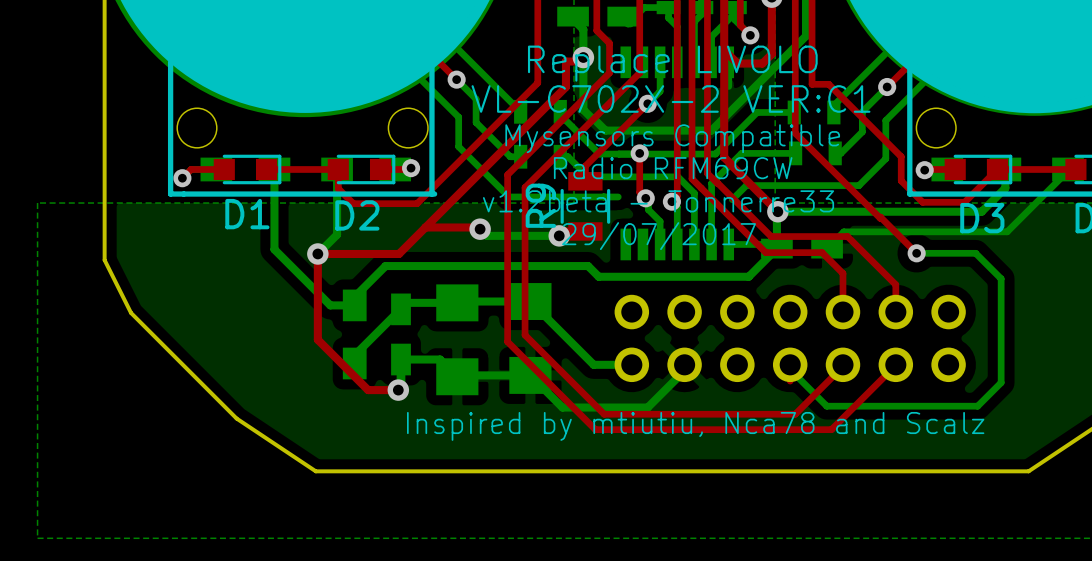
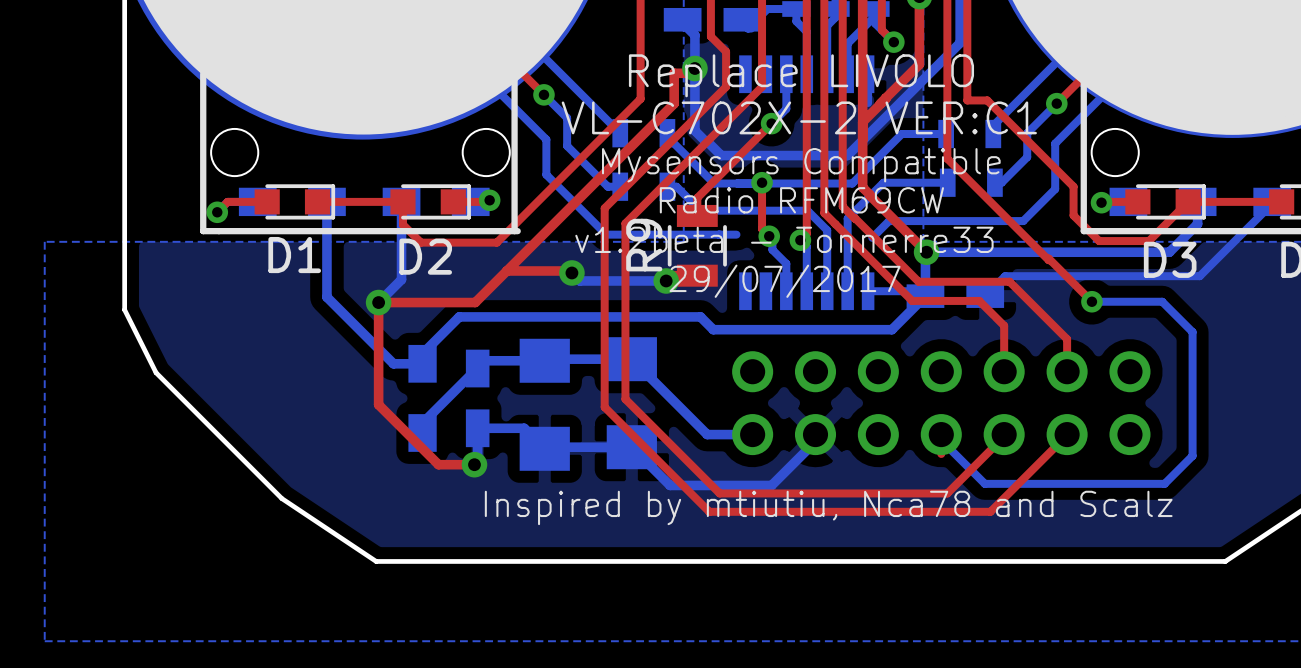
top track: (724, 50) (737, 63) (762, 63) -> (880, 103) (908, 75)
top track: none -> (885, 98) (862, 122)

